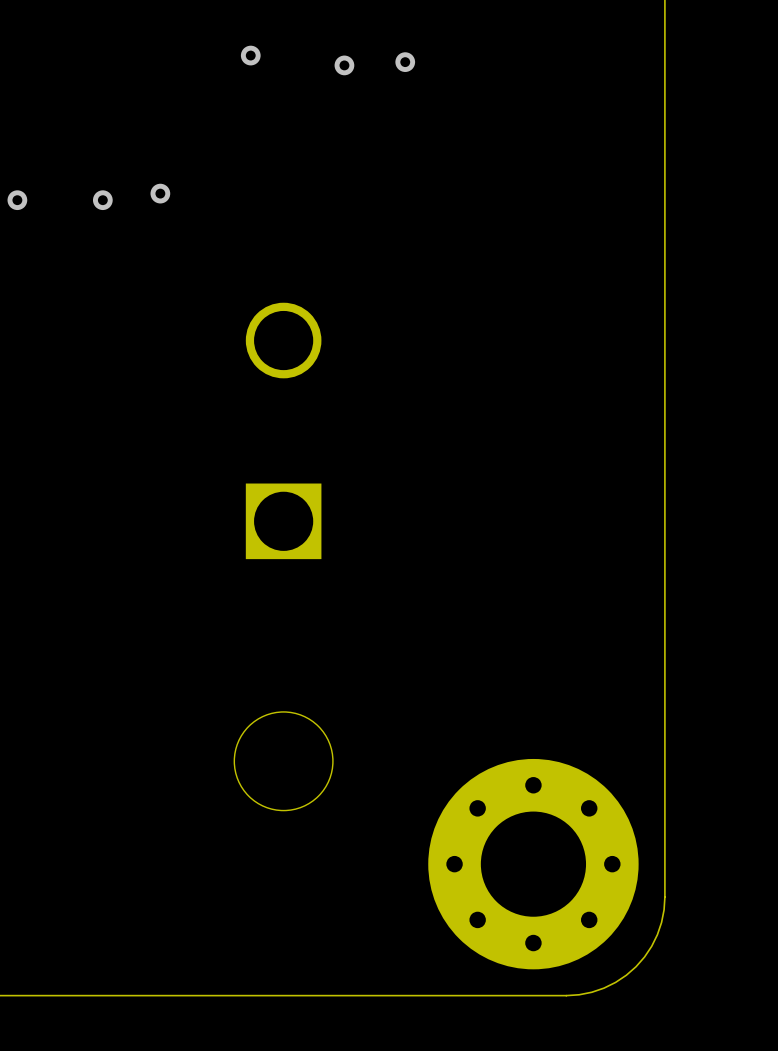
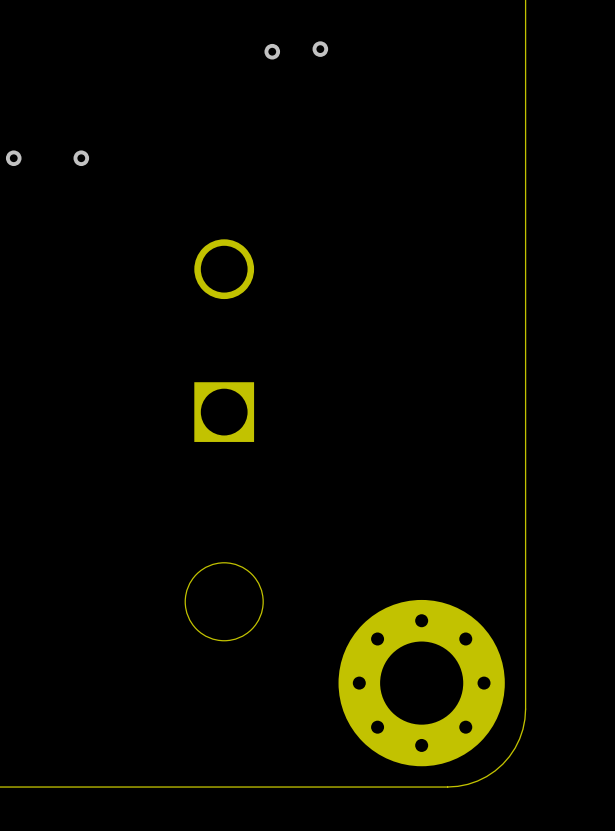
via: (250, 55) -> none
via: (160, 193) -> none

